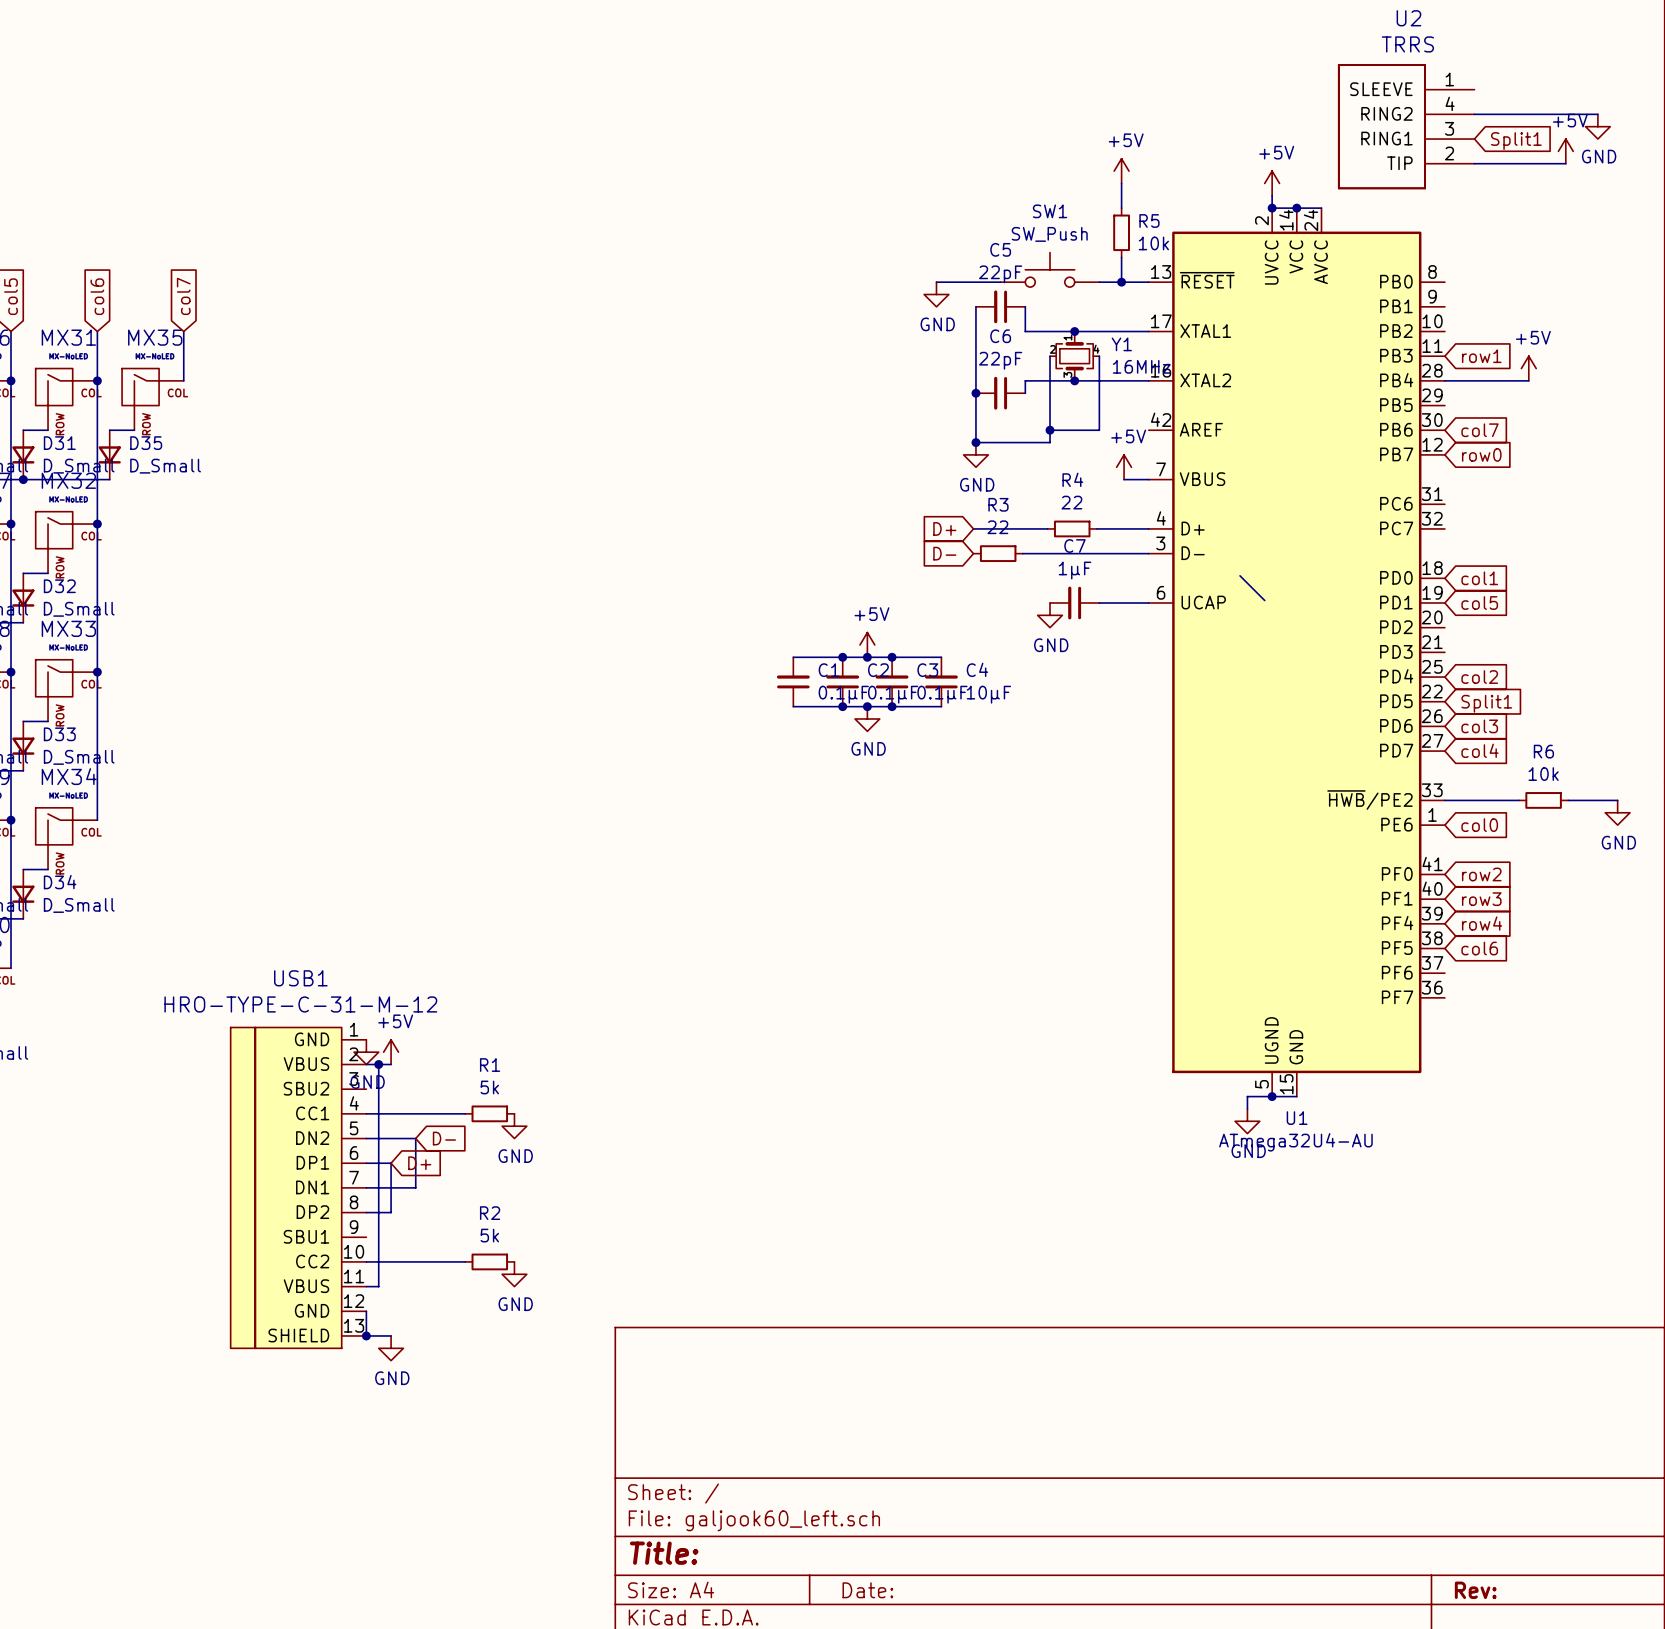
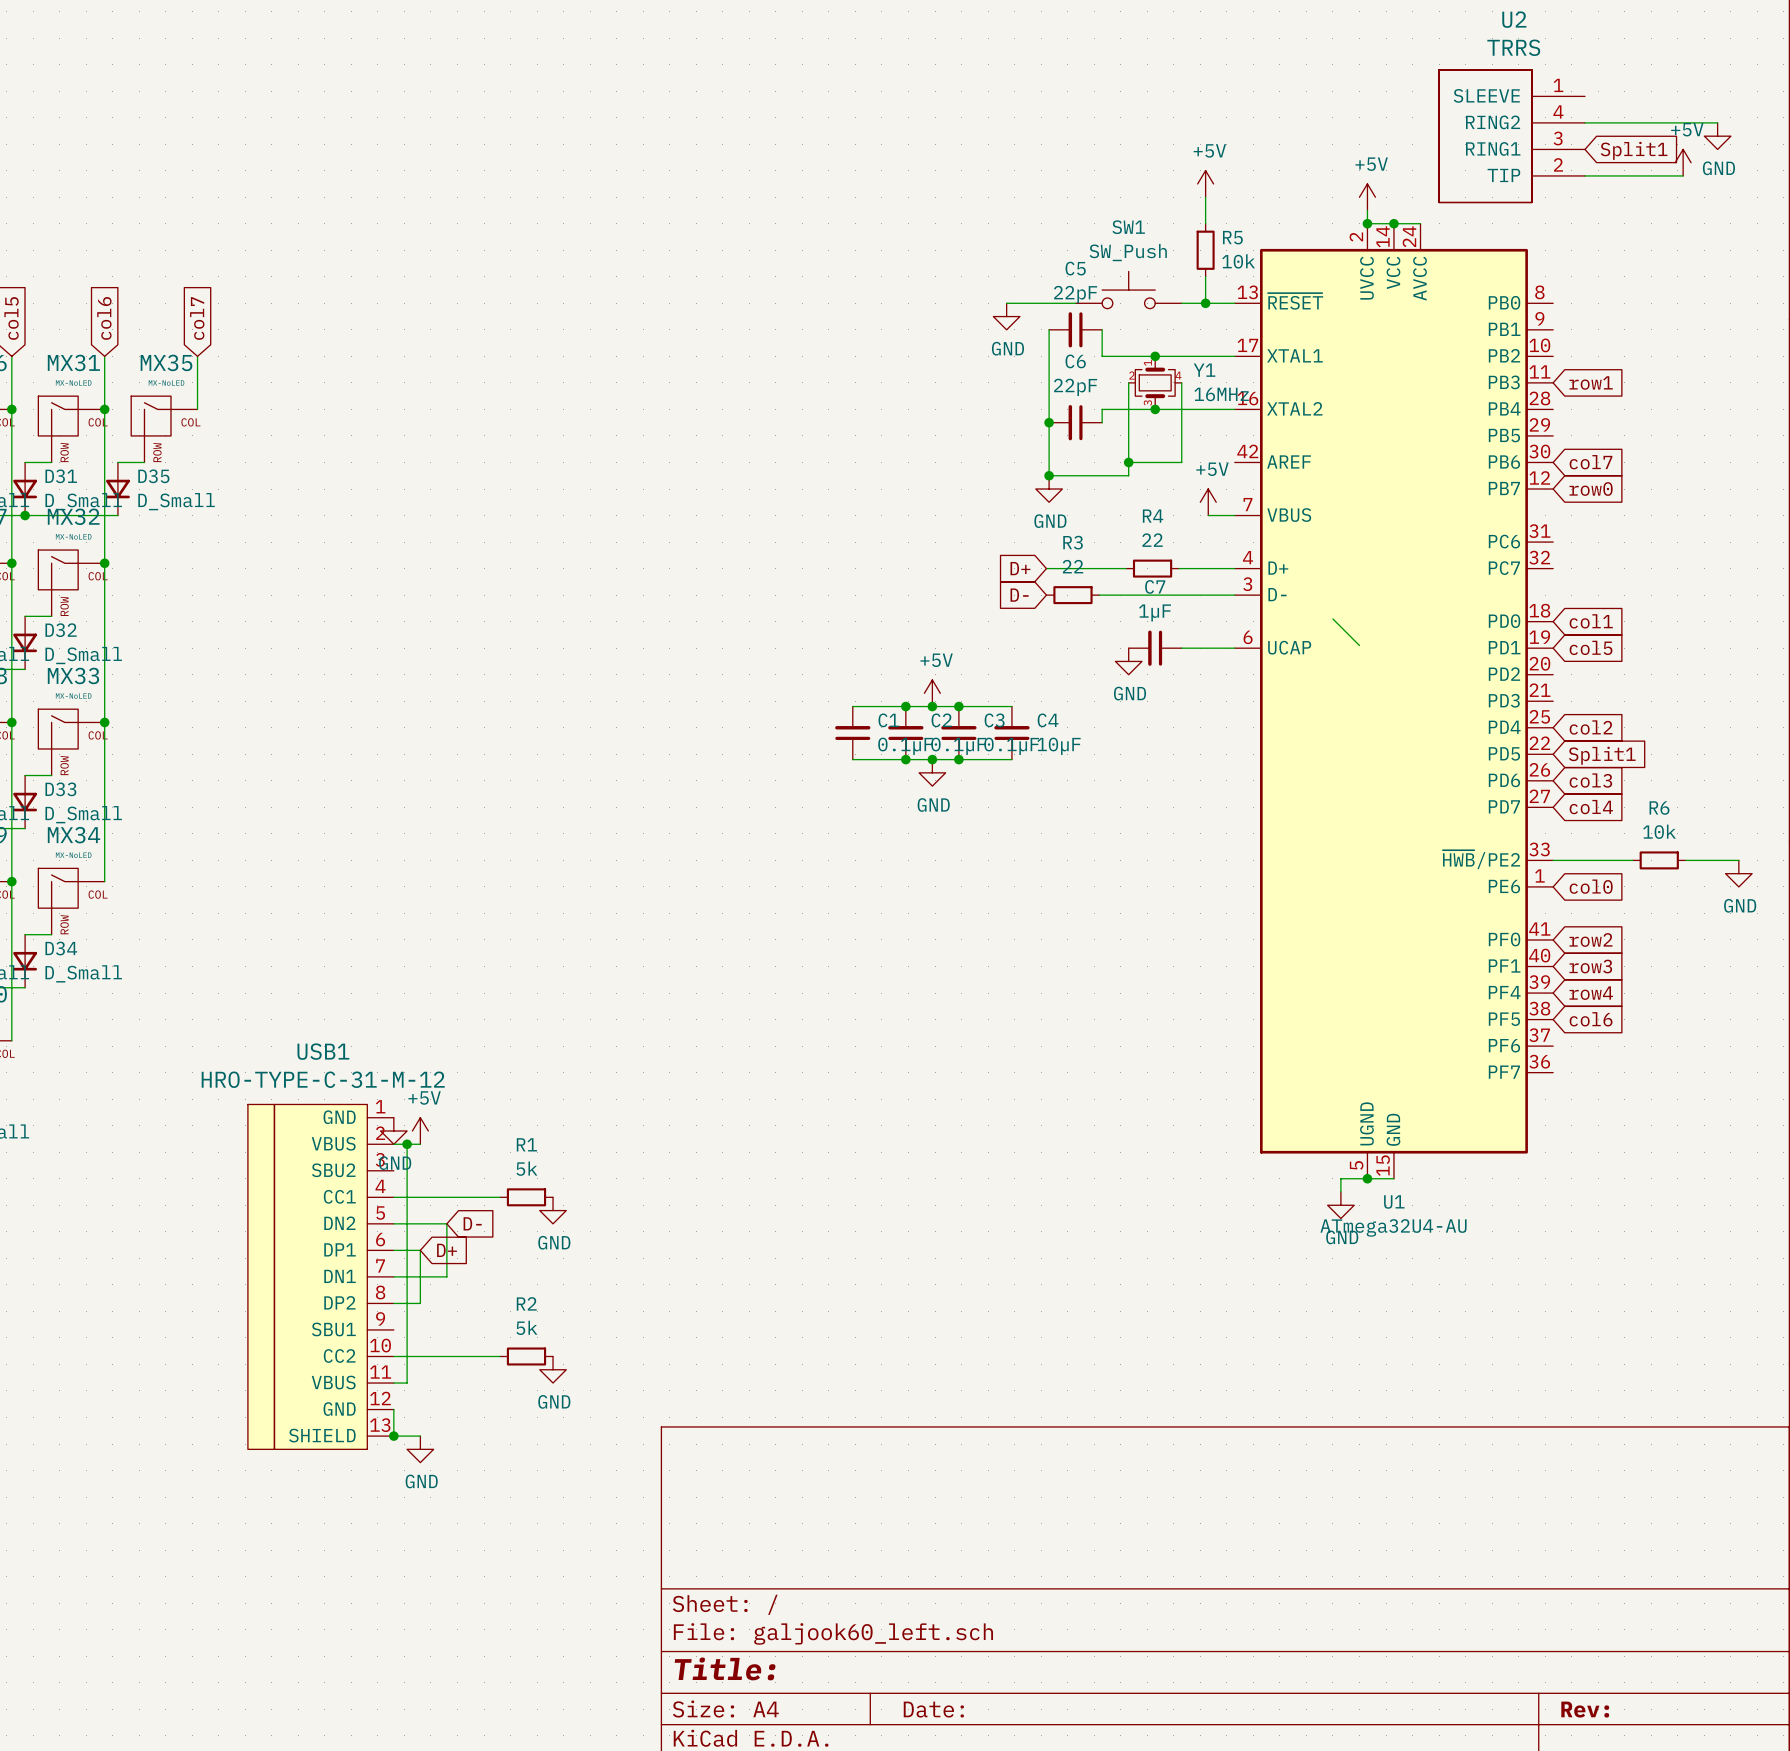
power symbol: +5V (1528, 368) -> none
wire: (1444, 380) (1528, 380) -> none

